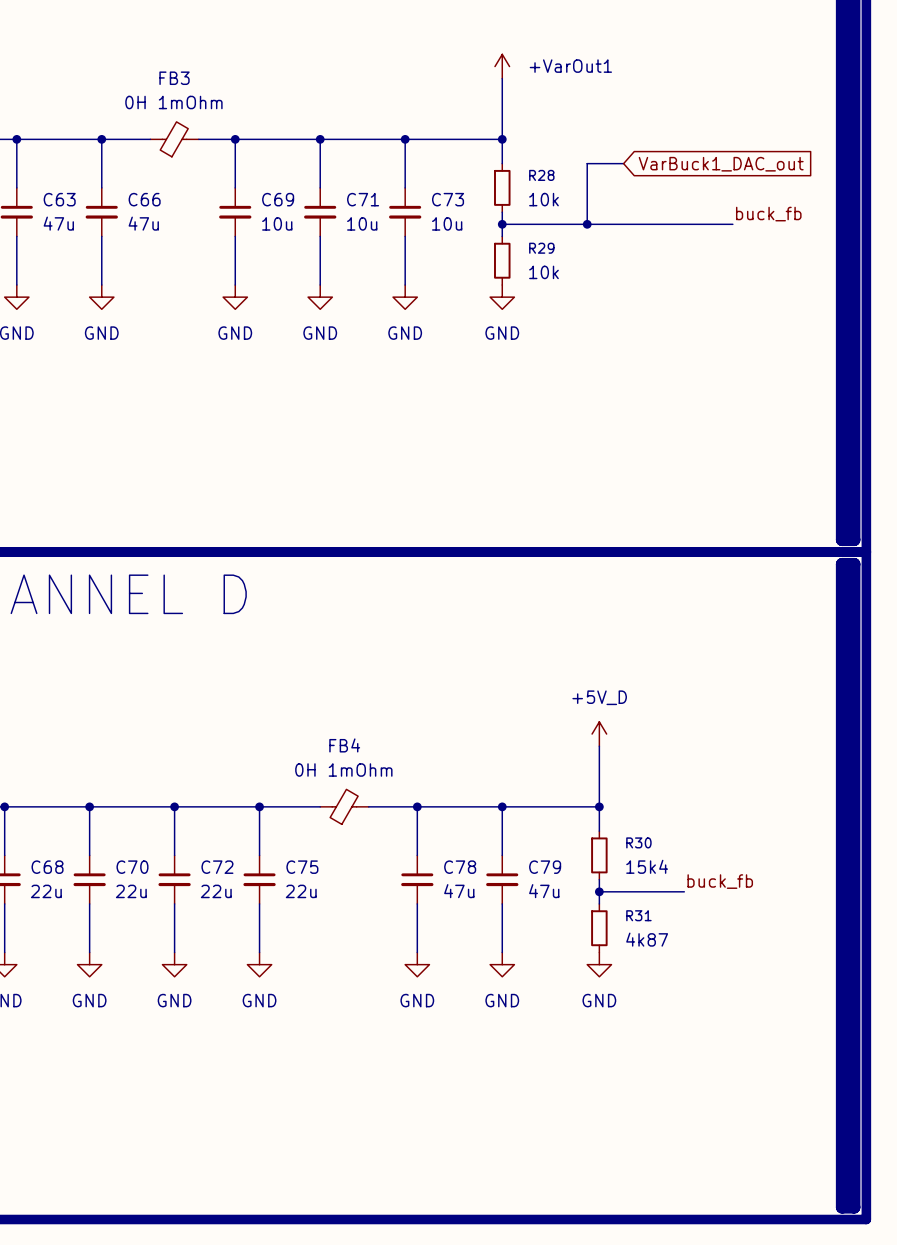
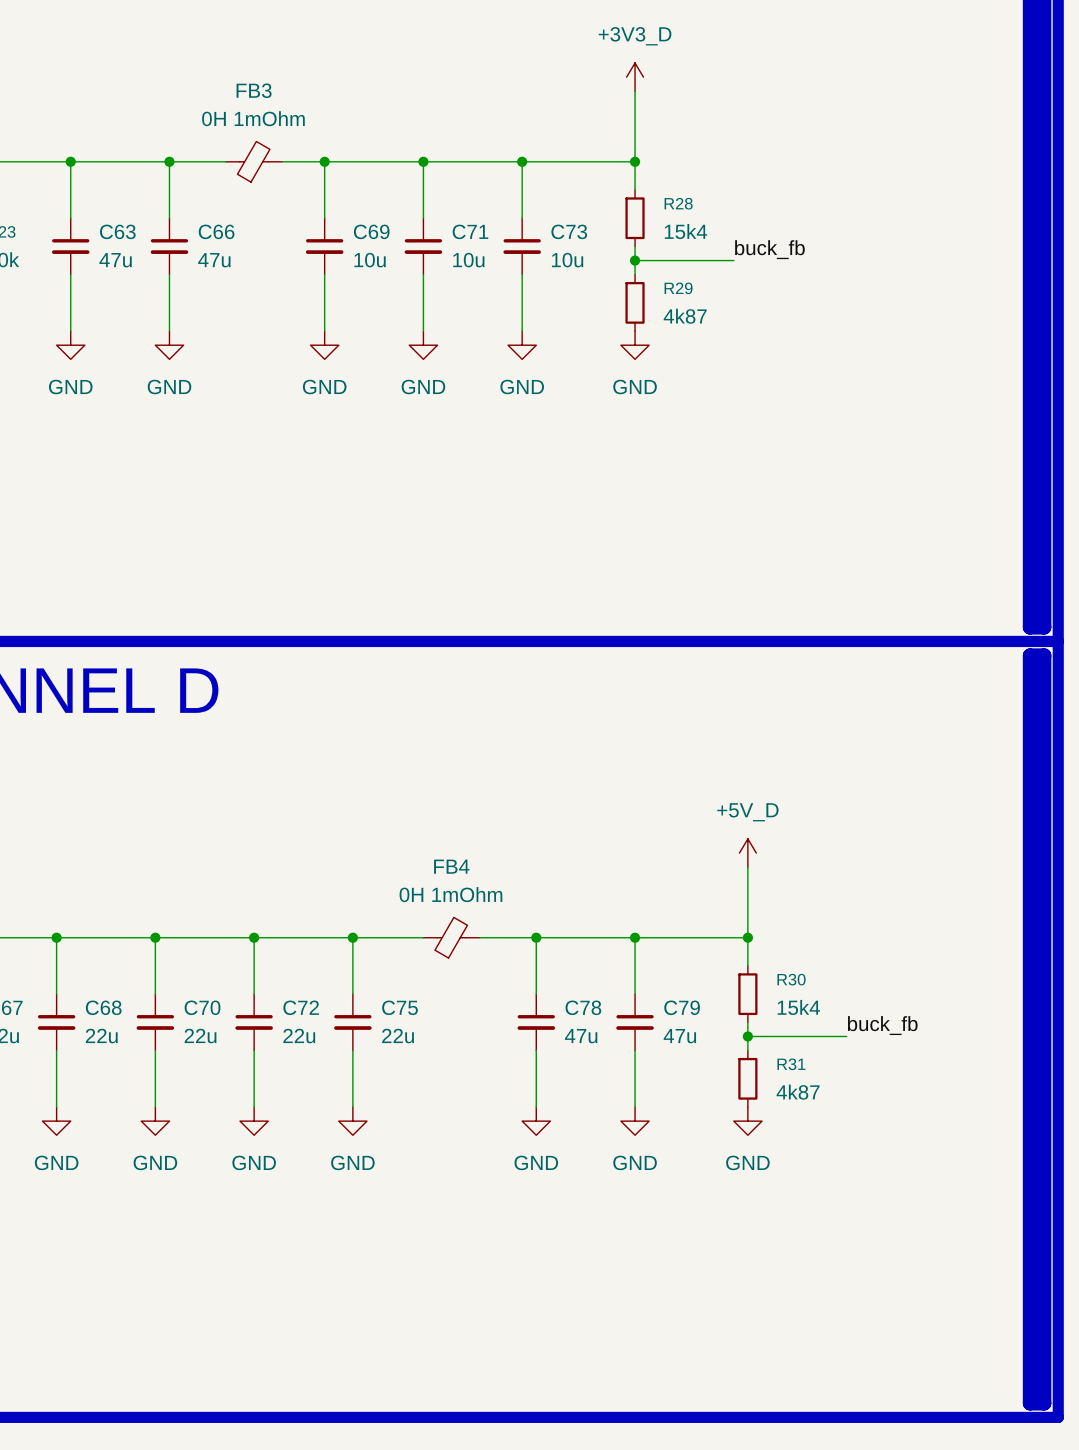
power symbol: +VarOut1 (502, 66) -> +3V3_D (635, 77)
wire: (623, 163) (587, 163) (587, 224) (732, 224) -> none
global label: VarBuck1_DAC_out (721, 164) -> none
R28 value: 10k (543, 199) -> 15k4 (685, 231)
label position: buck_fb (768, 214) -> buck_fb (769, 249)
junction: (587, 224) -> none
R29 value: 10k (543, 272) -> 4k87 (685, 316)

